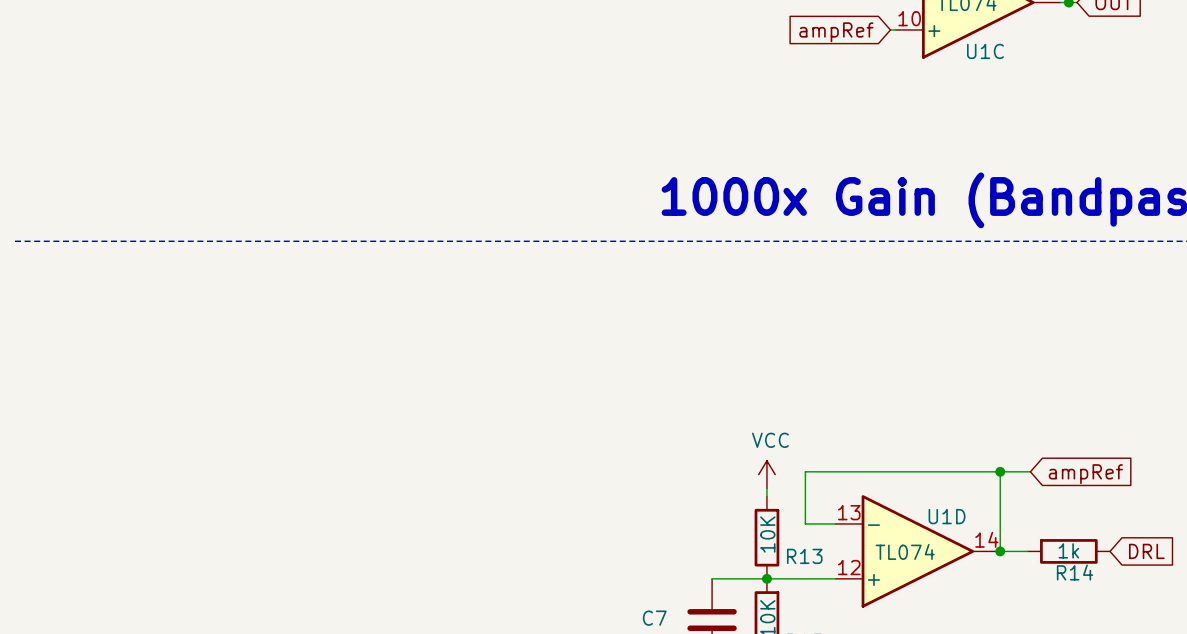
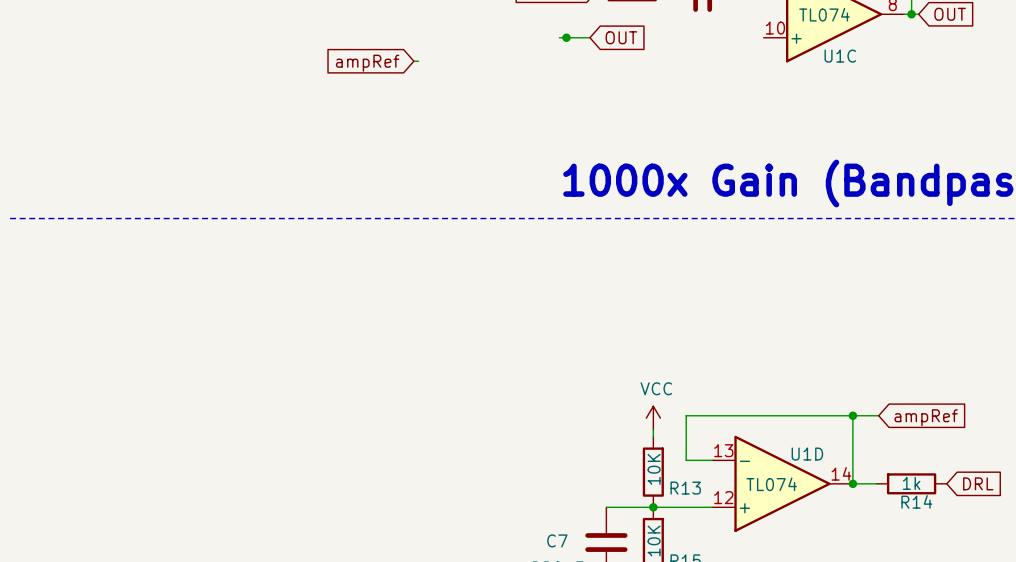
wire: none -> (559, 37) (589, 37)
junction: none -> (566, 37)
global label: none -> OUT (621, 37)
wire: (890, 29) (895, 29) -> none
global label: ampRef (836, 32) -> none
wire: none -> (413, 61) (418, 61)
global label: none -> ampRef (367, 63)

